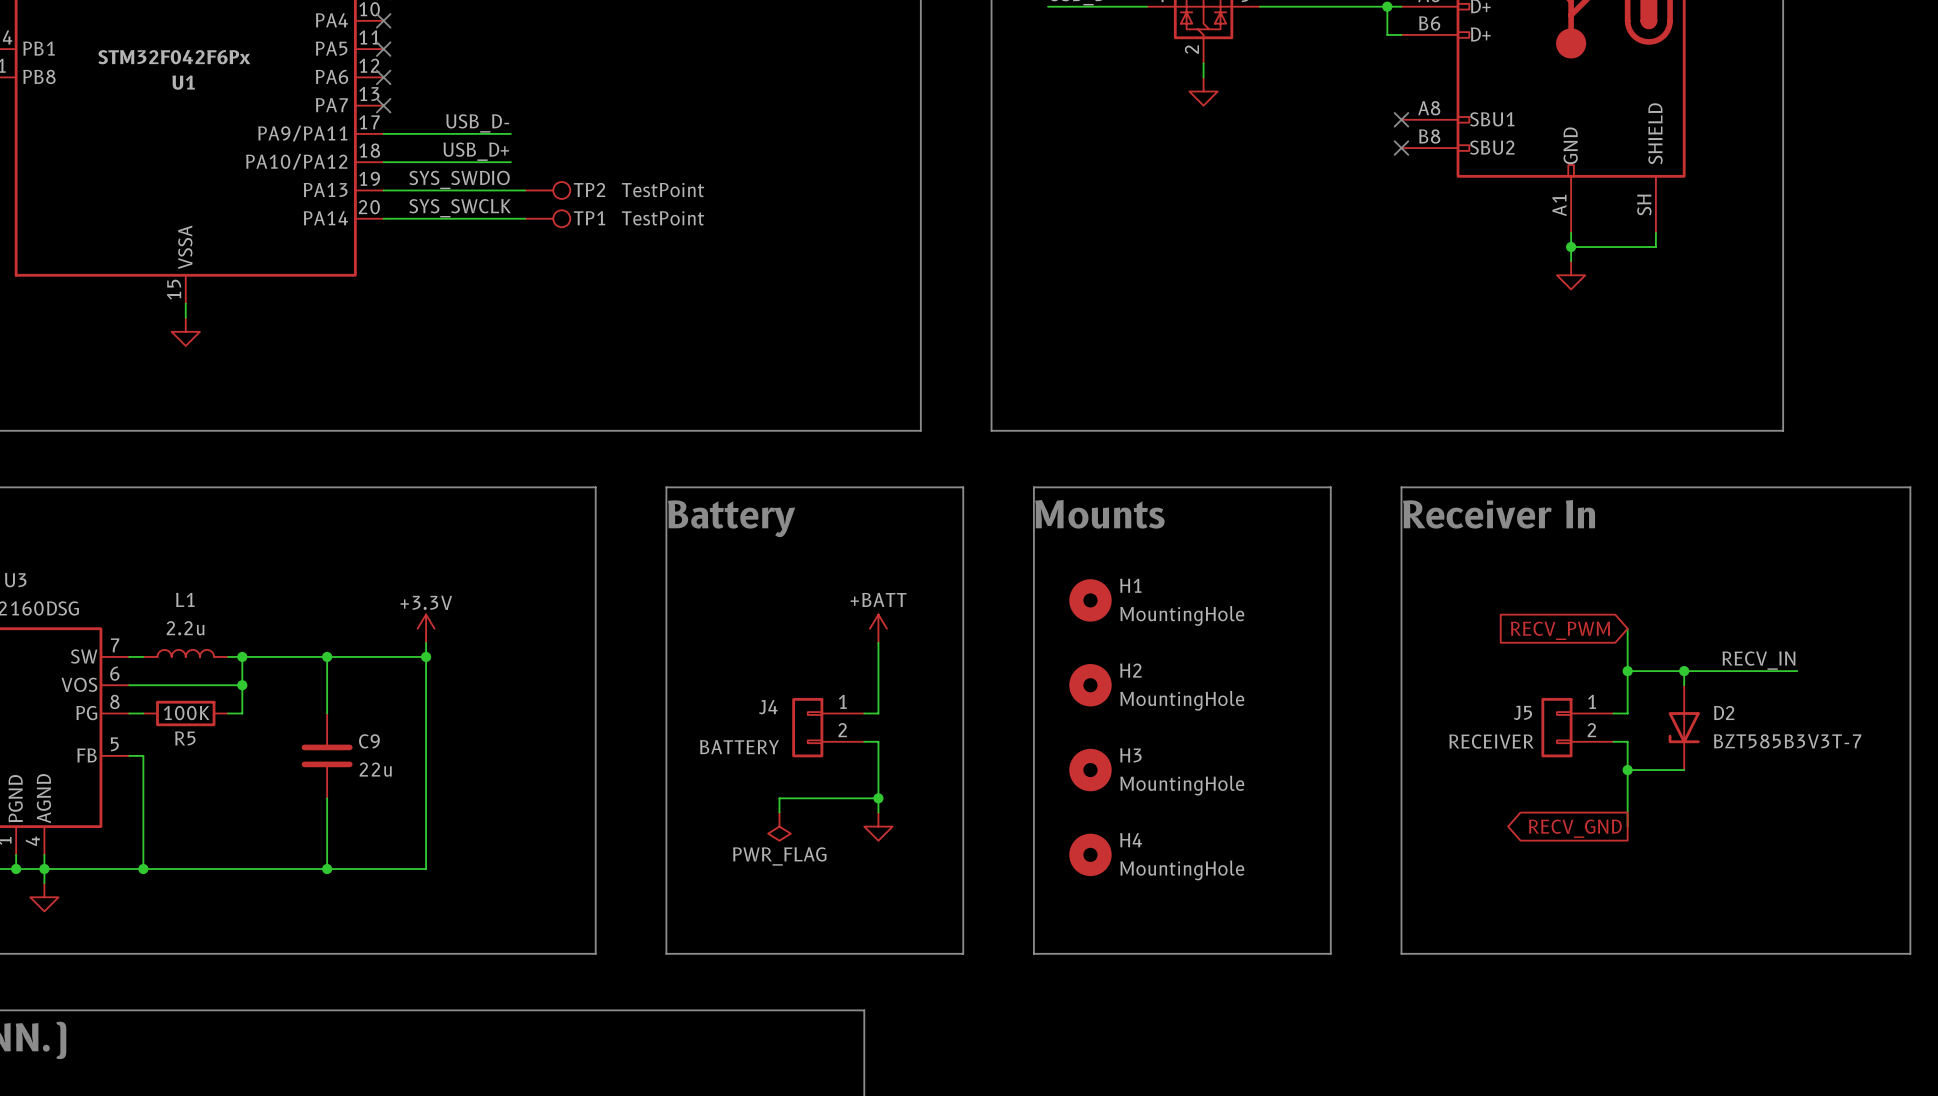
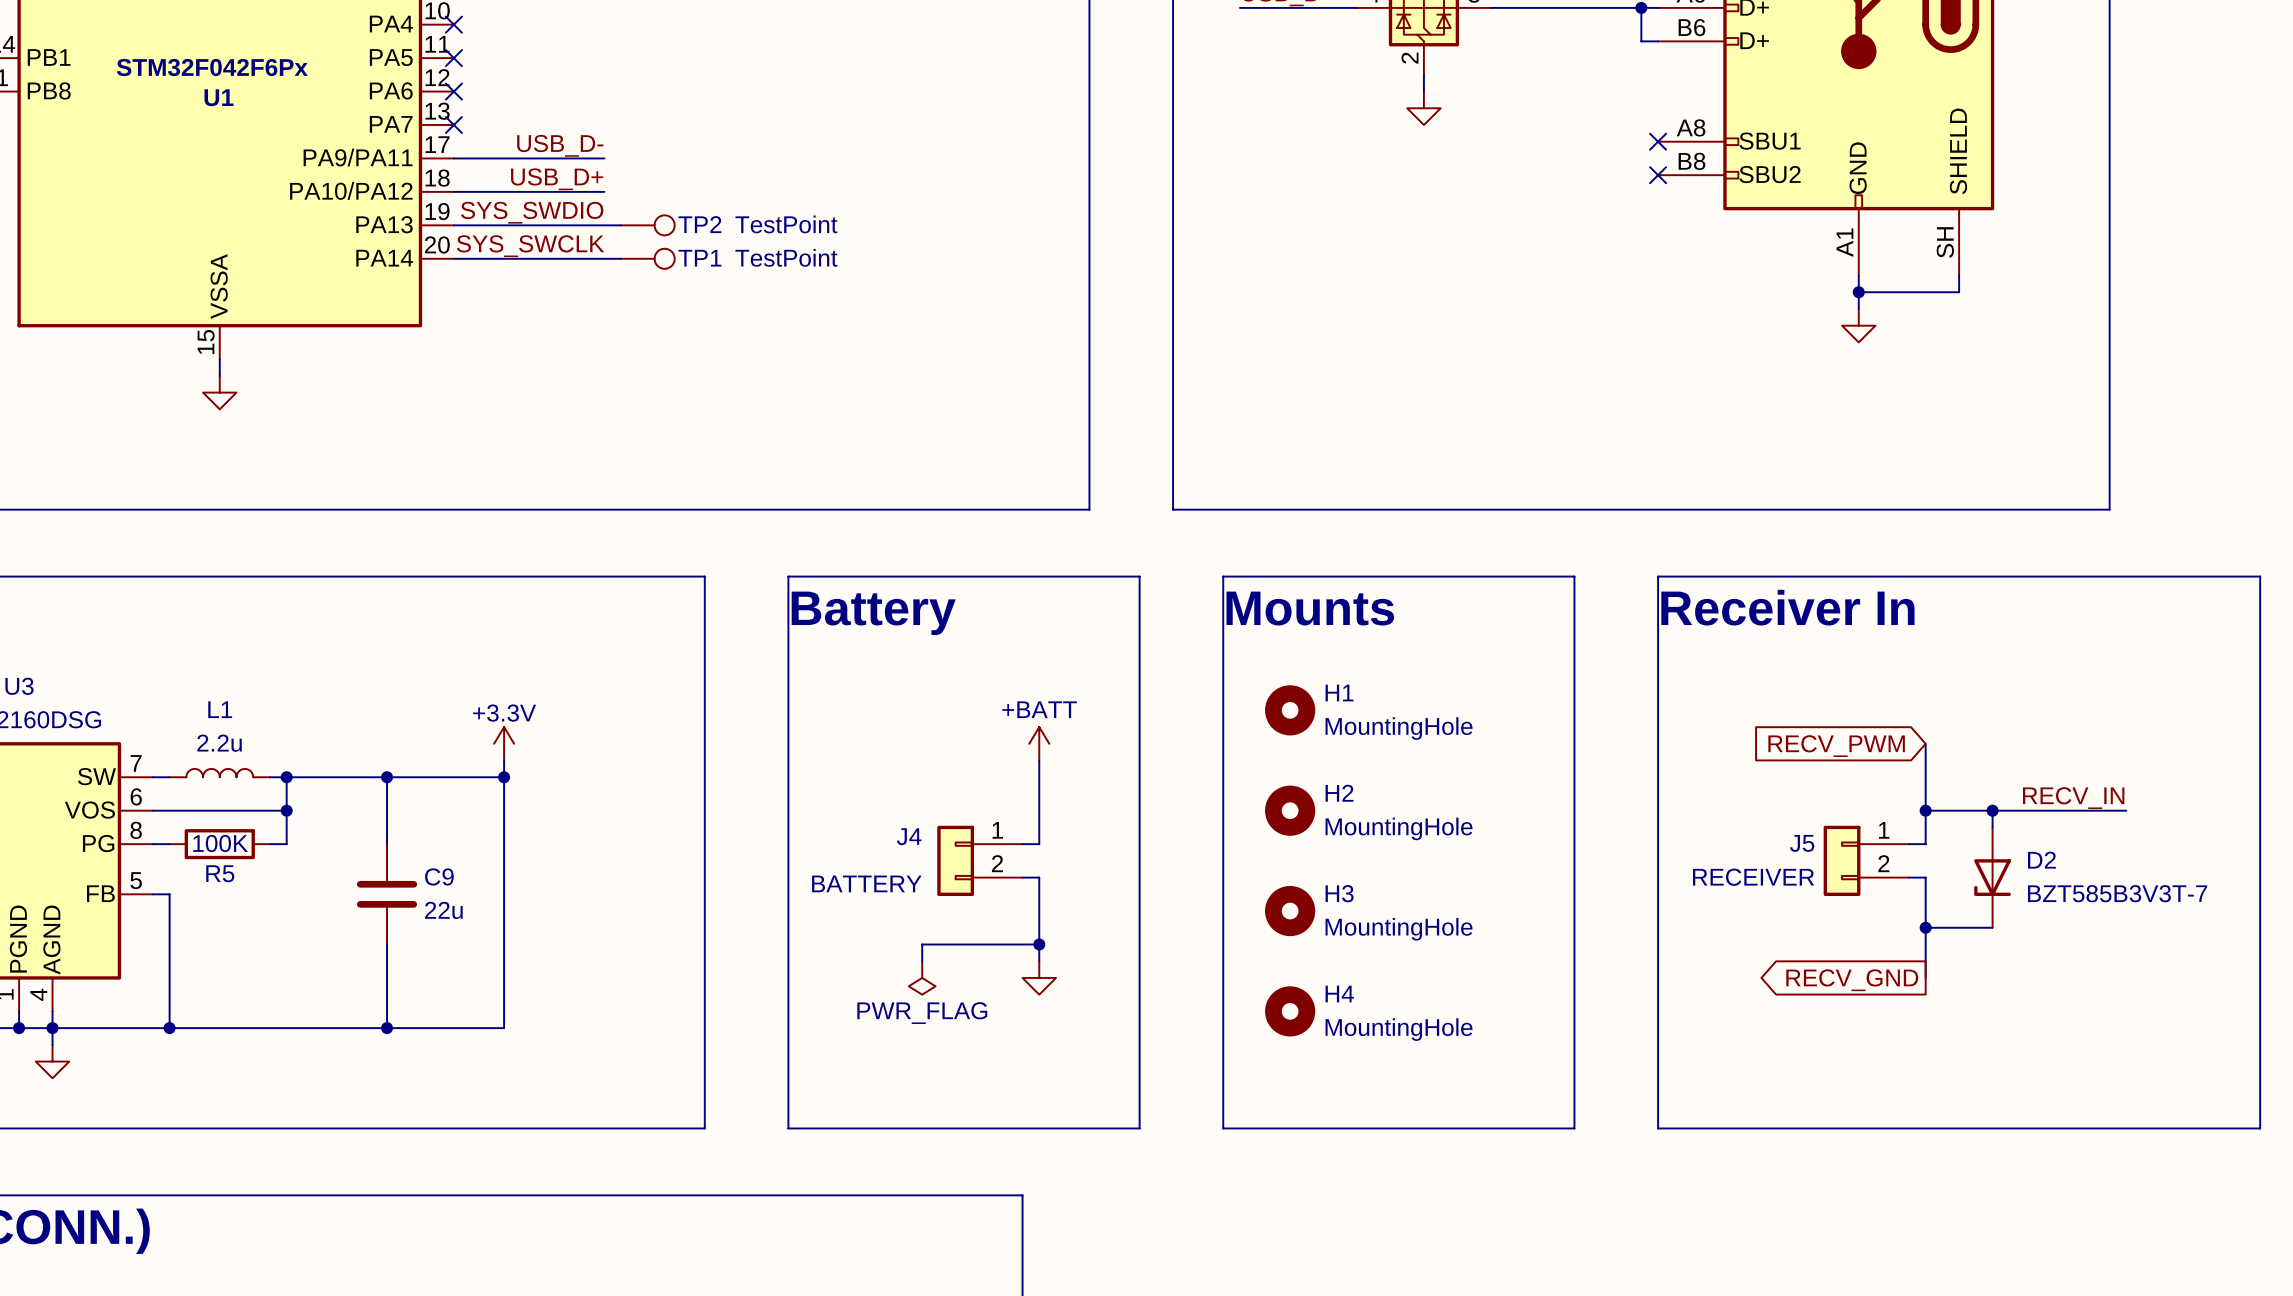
label position: RECV_IN (1758, 660) -> RECV_IN (2073, 798)
wire: (1627, 671) (1797, 671) -> (1925, 810) (2126, 810)
junction position: (1627, 671) -> (1925, 810)
junction position: (1684, 671) -> (1992, 810)
D2 position: (1684, 727) -> (1992, 877)
wire: (1627, 770) (1684, 770) -> (1925, 927) (1992, 927)
junction position: (1627, 770) -> (1925, 927)

